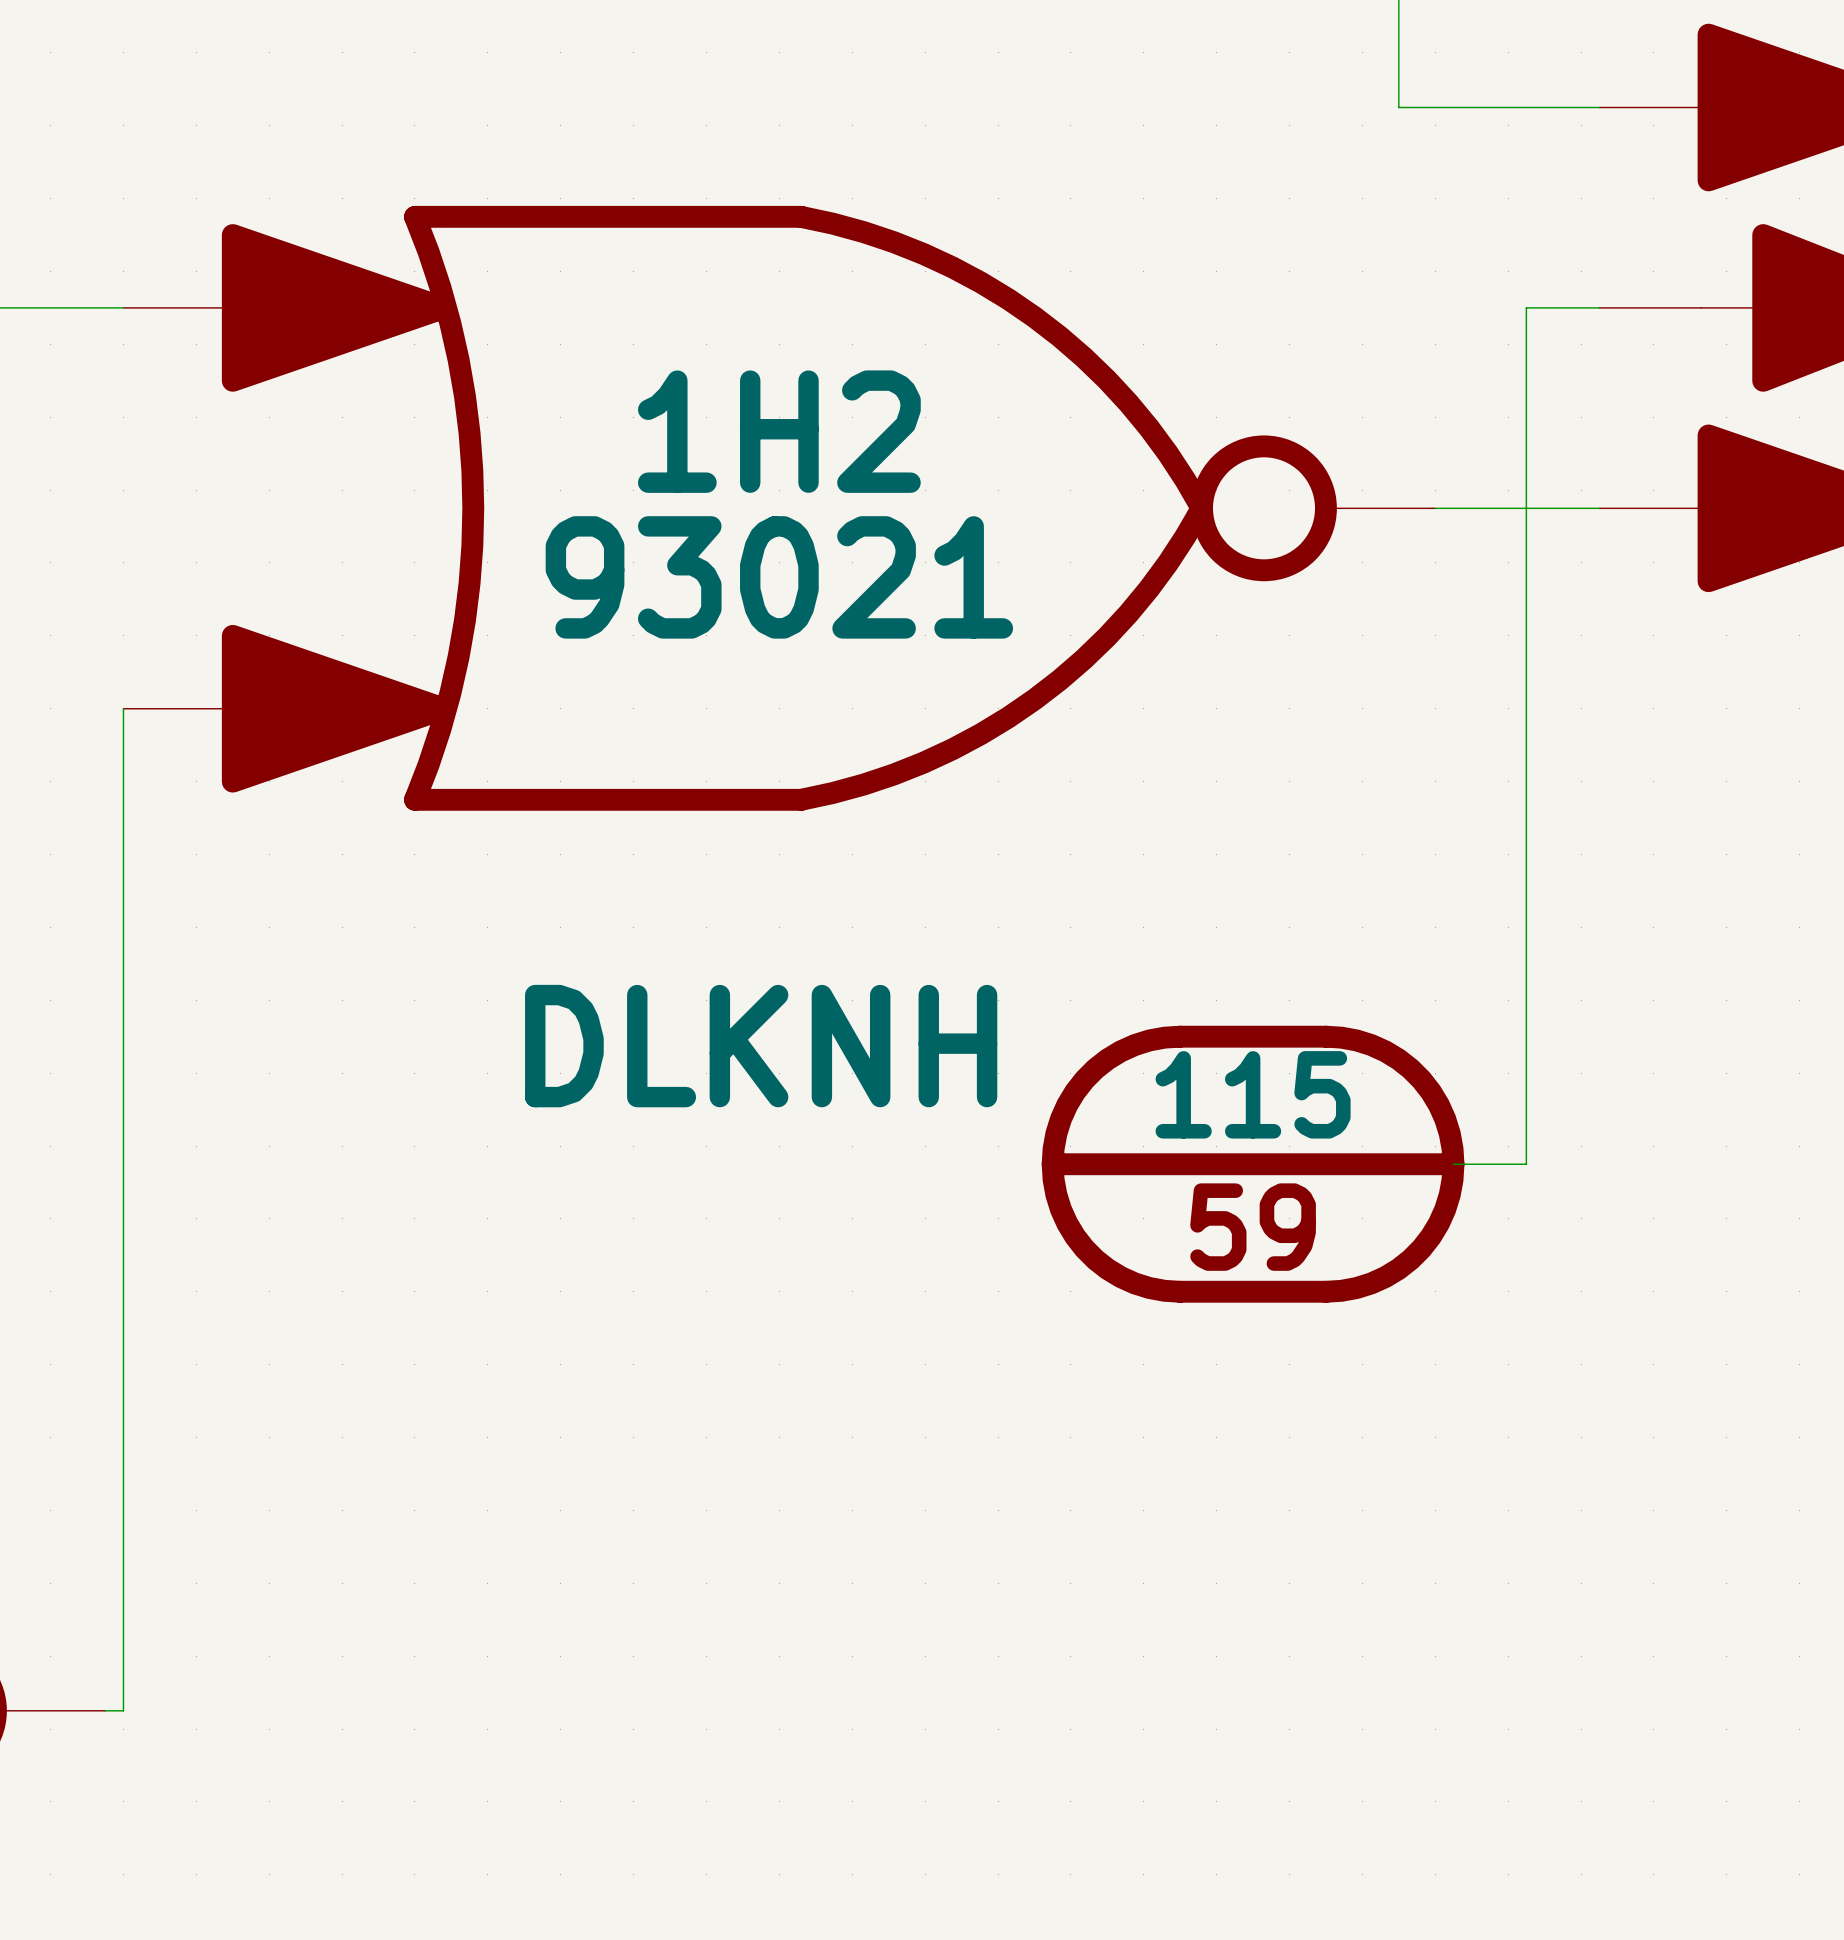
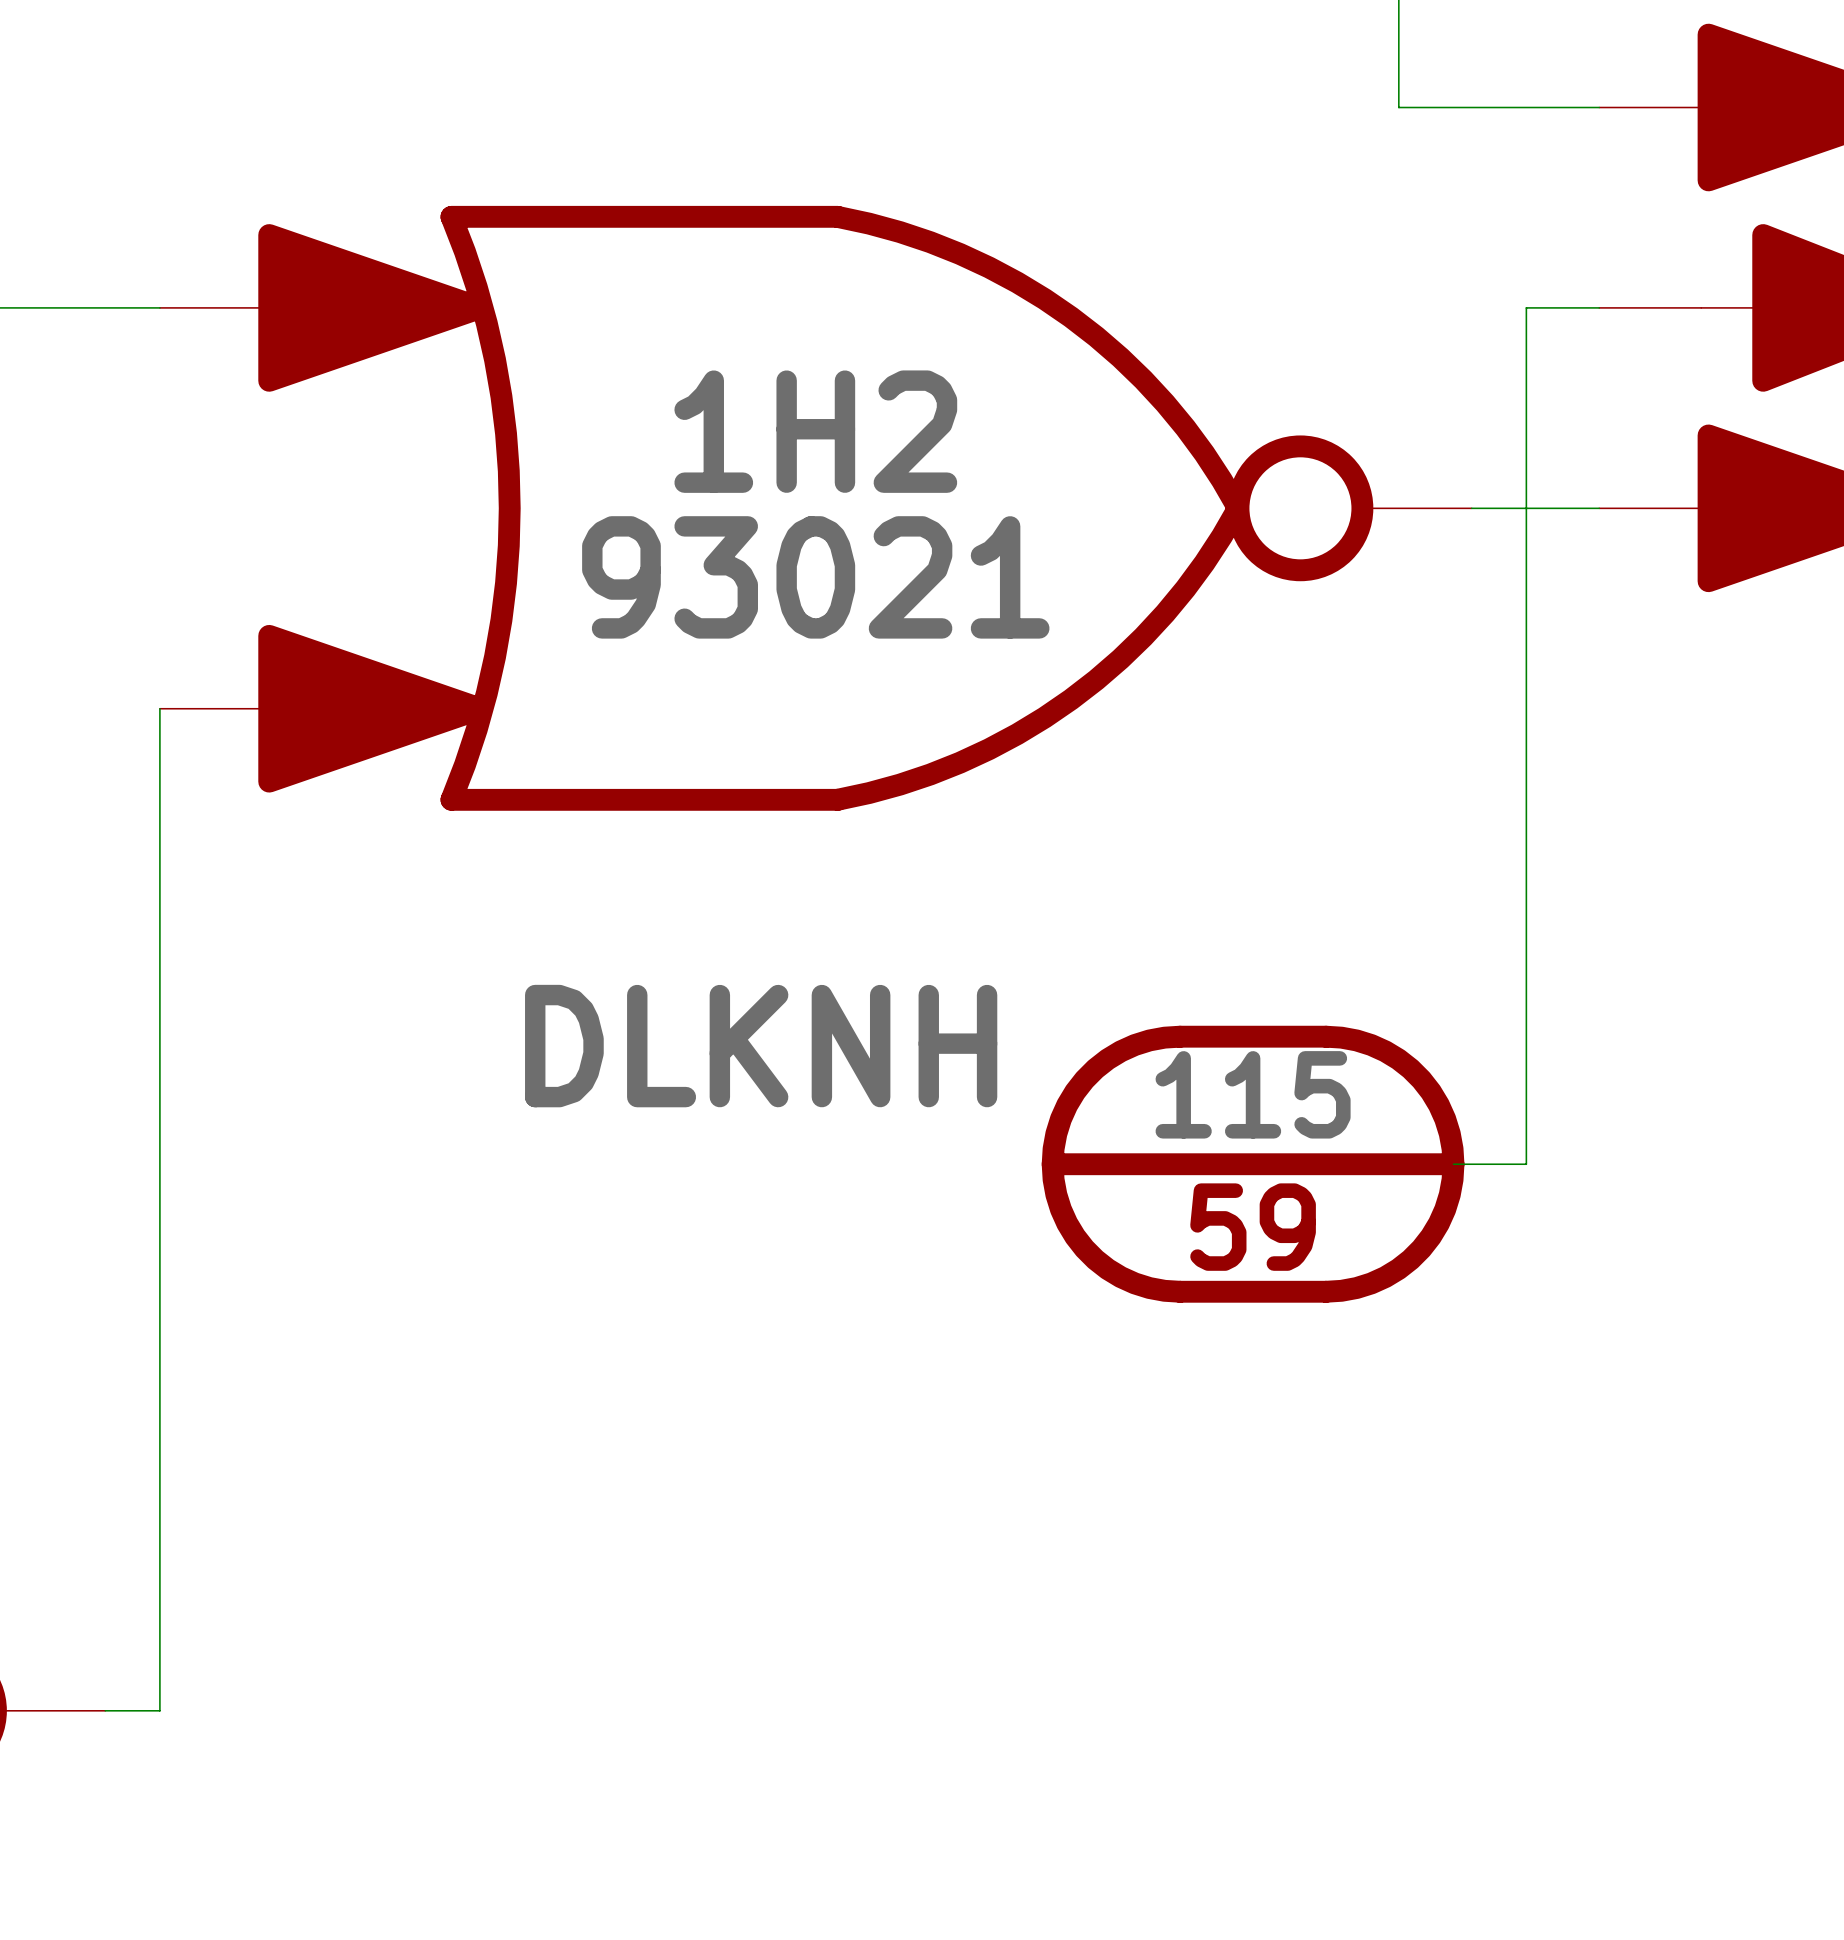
part position: (779, 508) -> (815, 508)
wire: (123, 708) (123, 1710) -> (159, 708) (159, 1710) (123, 1710)

